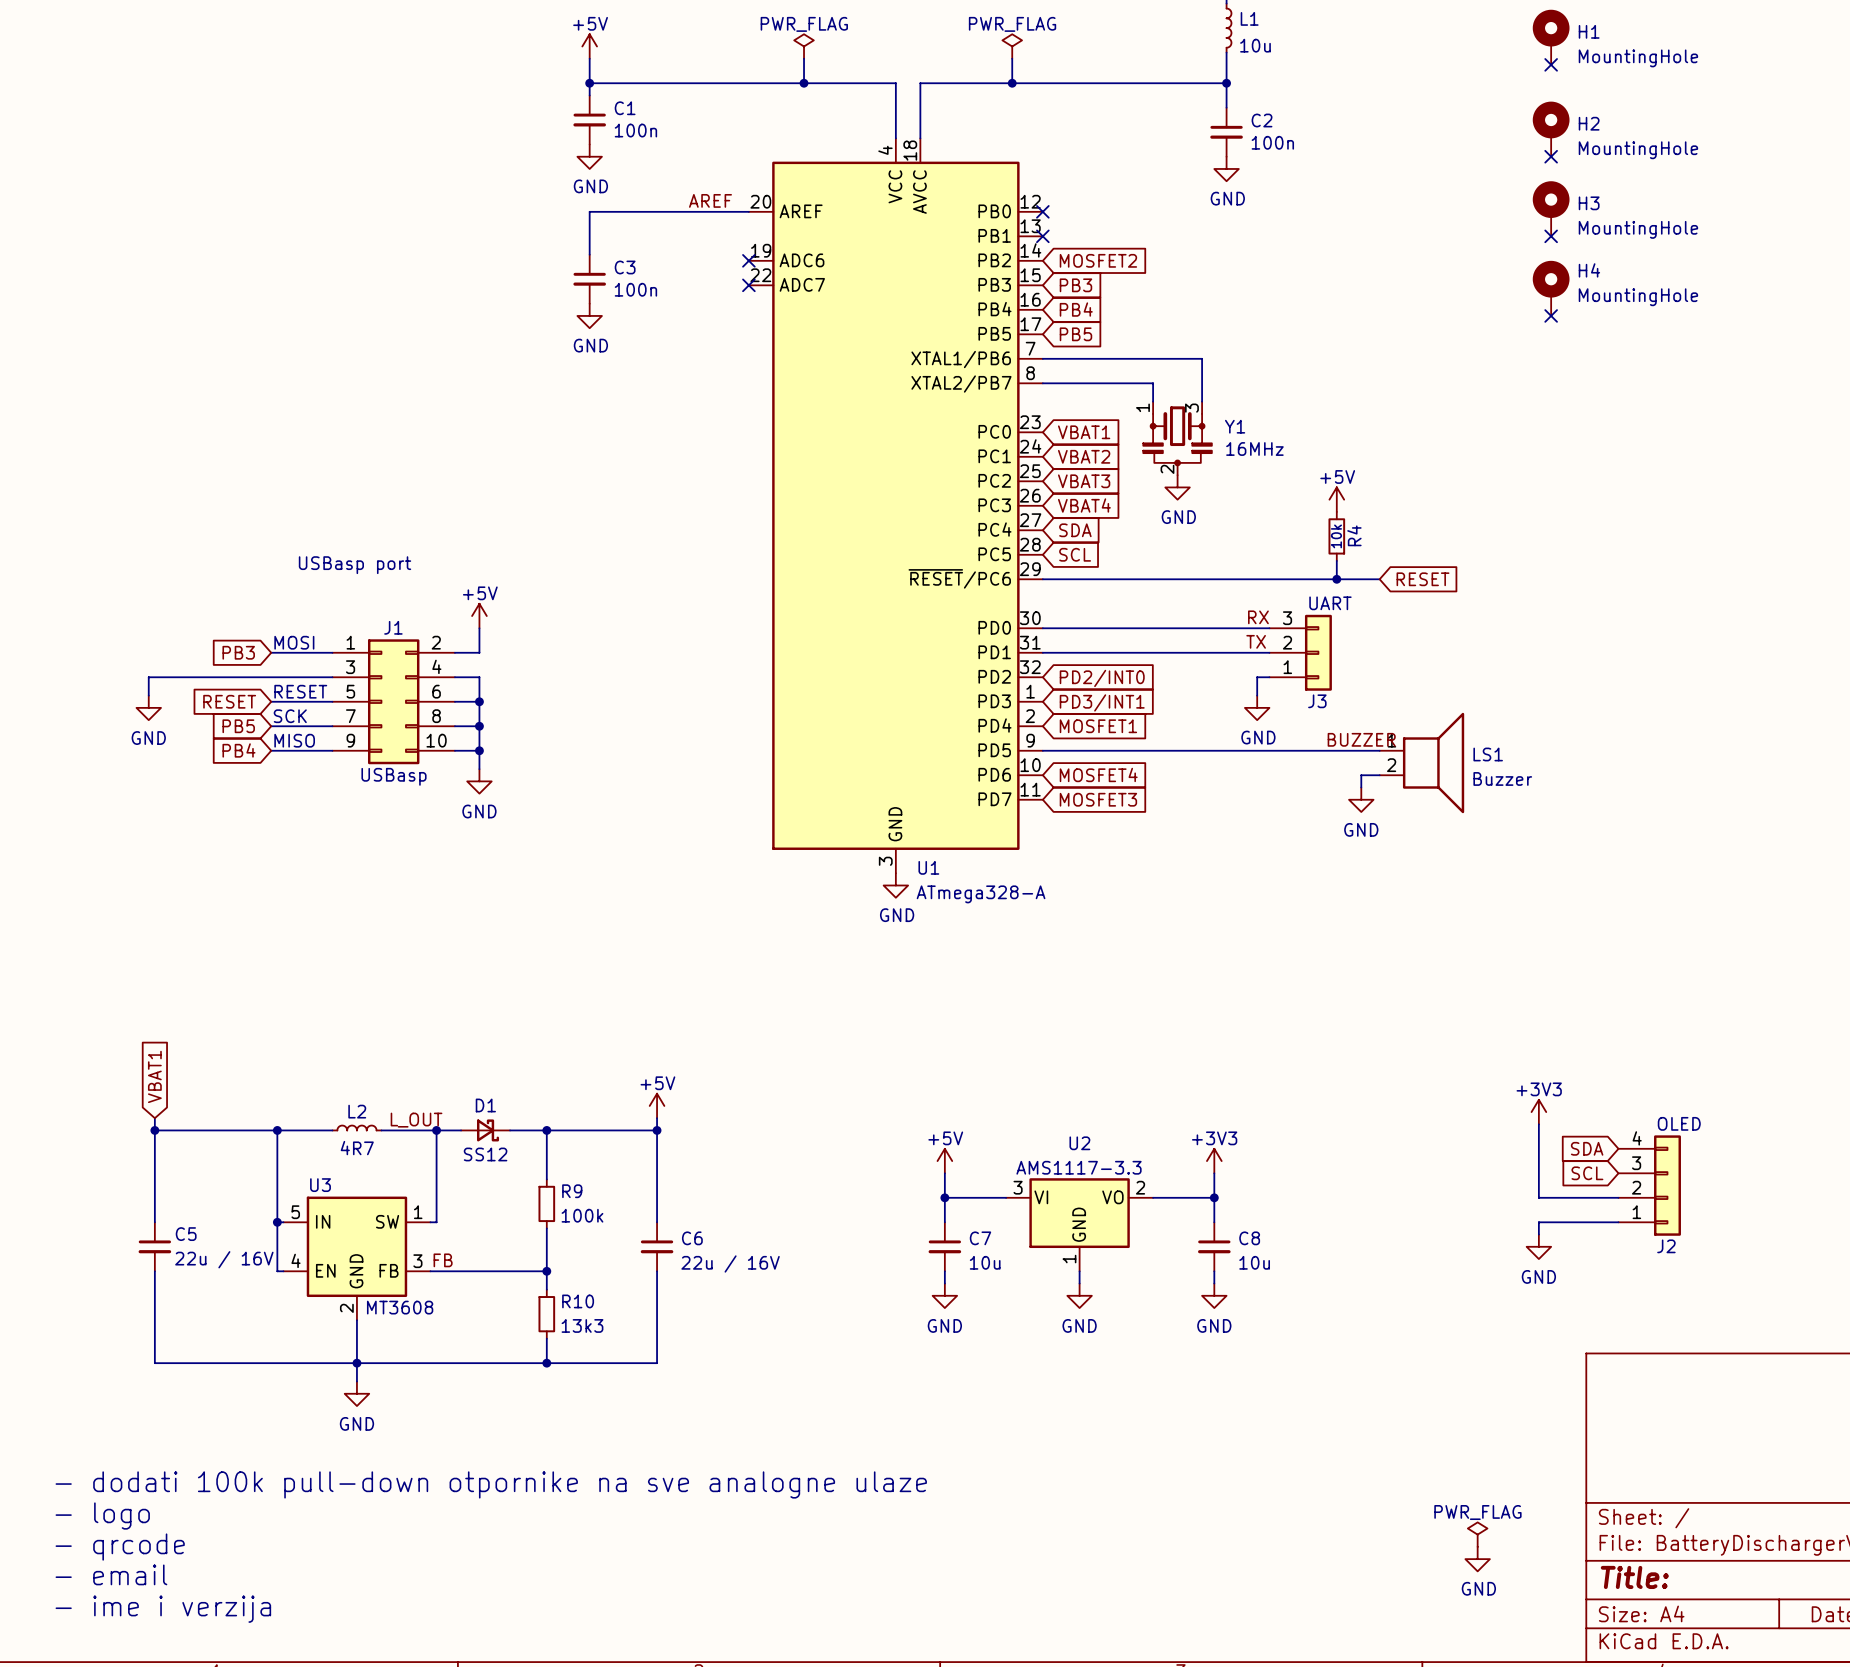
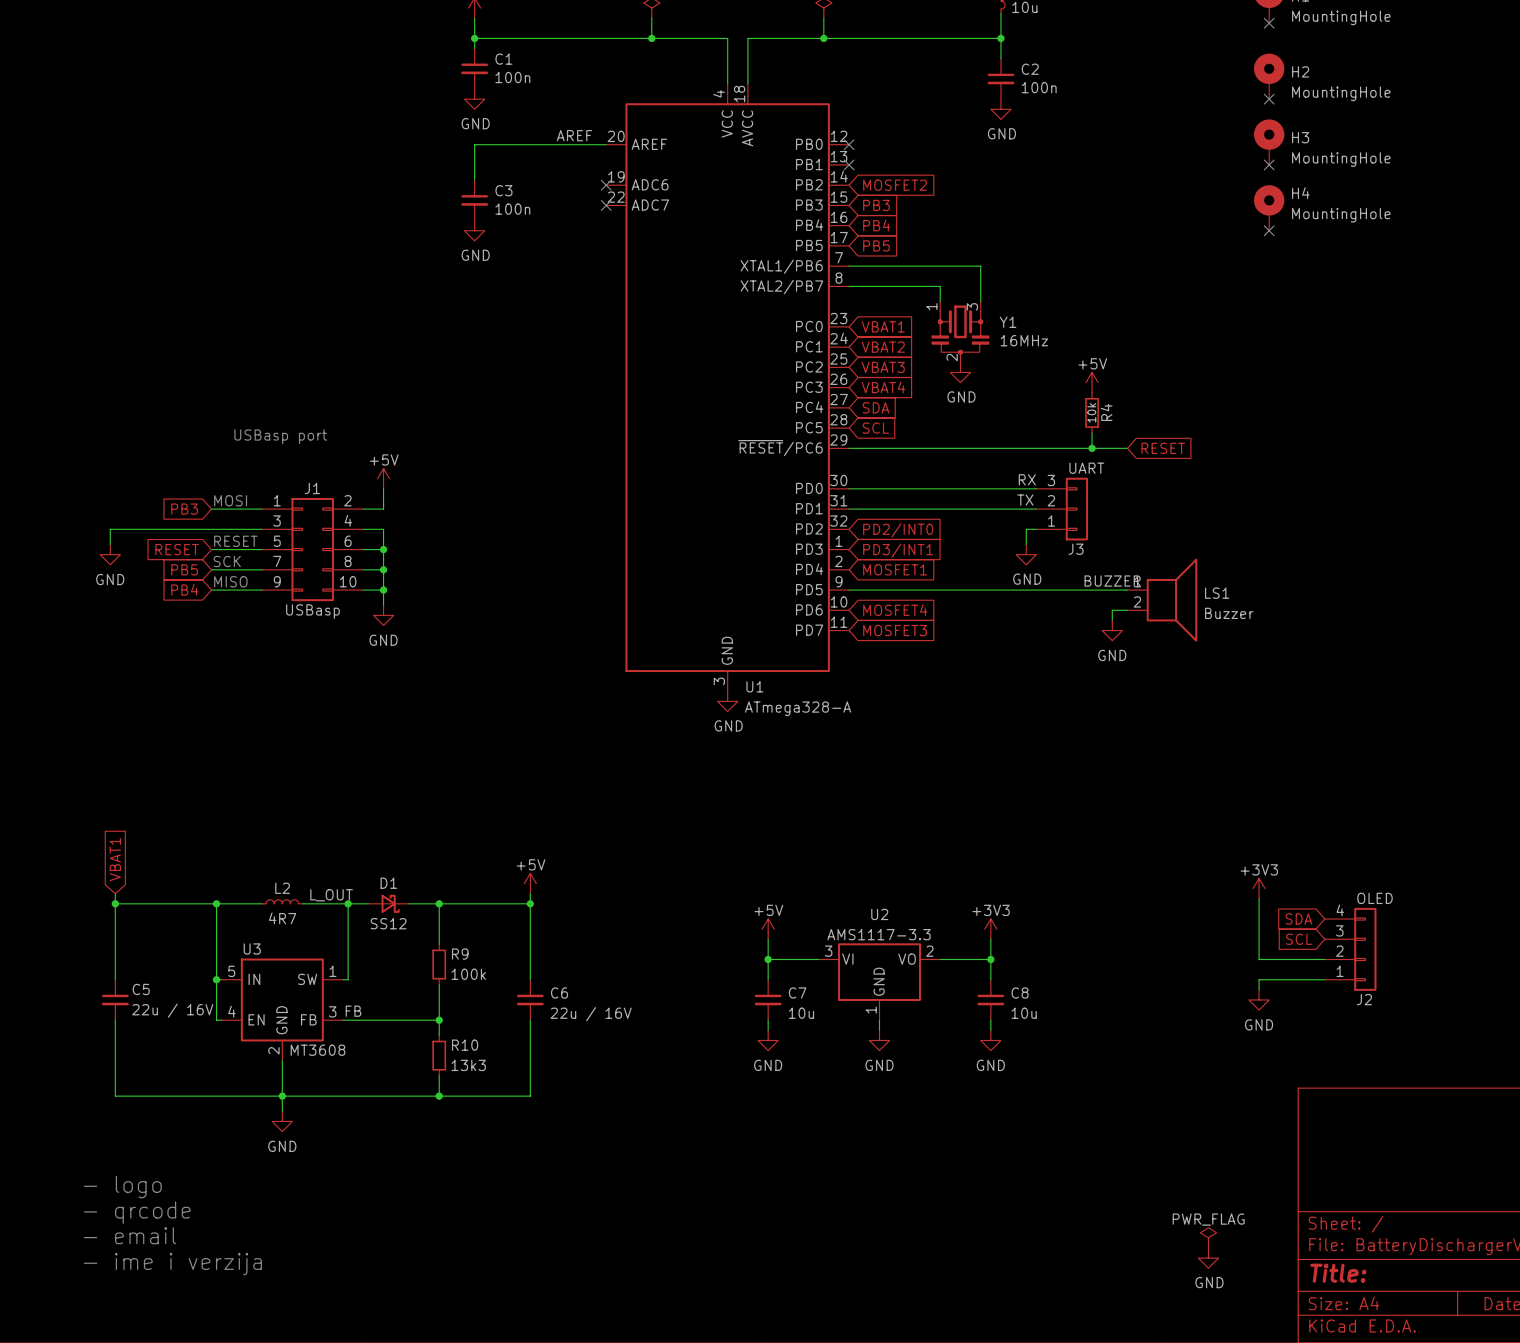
text: - dodati 100k pull-down otpornike na sve analogne ulaze (491, 1484) -> none
text position: - logo (102, 1516) -> - logo (122, 1187)
text position: - qrcode (120, 1547) -> - qrcode (137, 1212)
text position: - email (111, 1574) -> - email (130, 1235)
text position: - ime i verzija (163, 1609) -> - ime i verzija (172, 1264)

